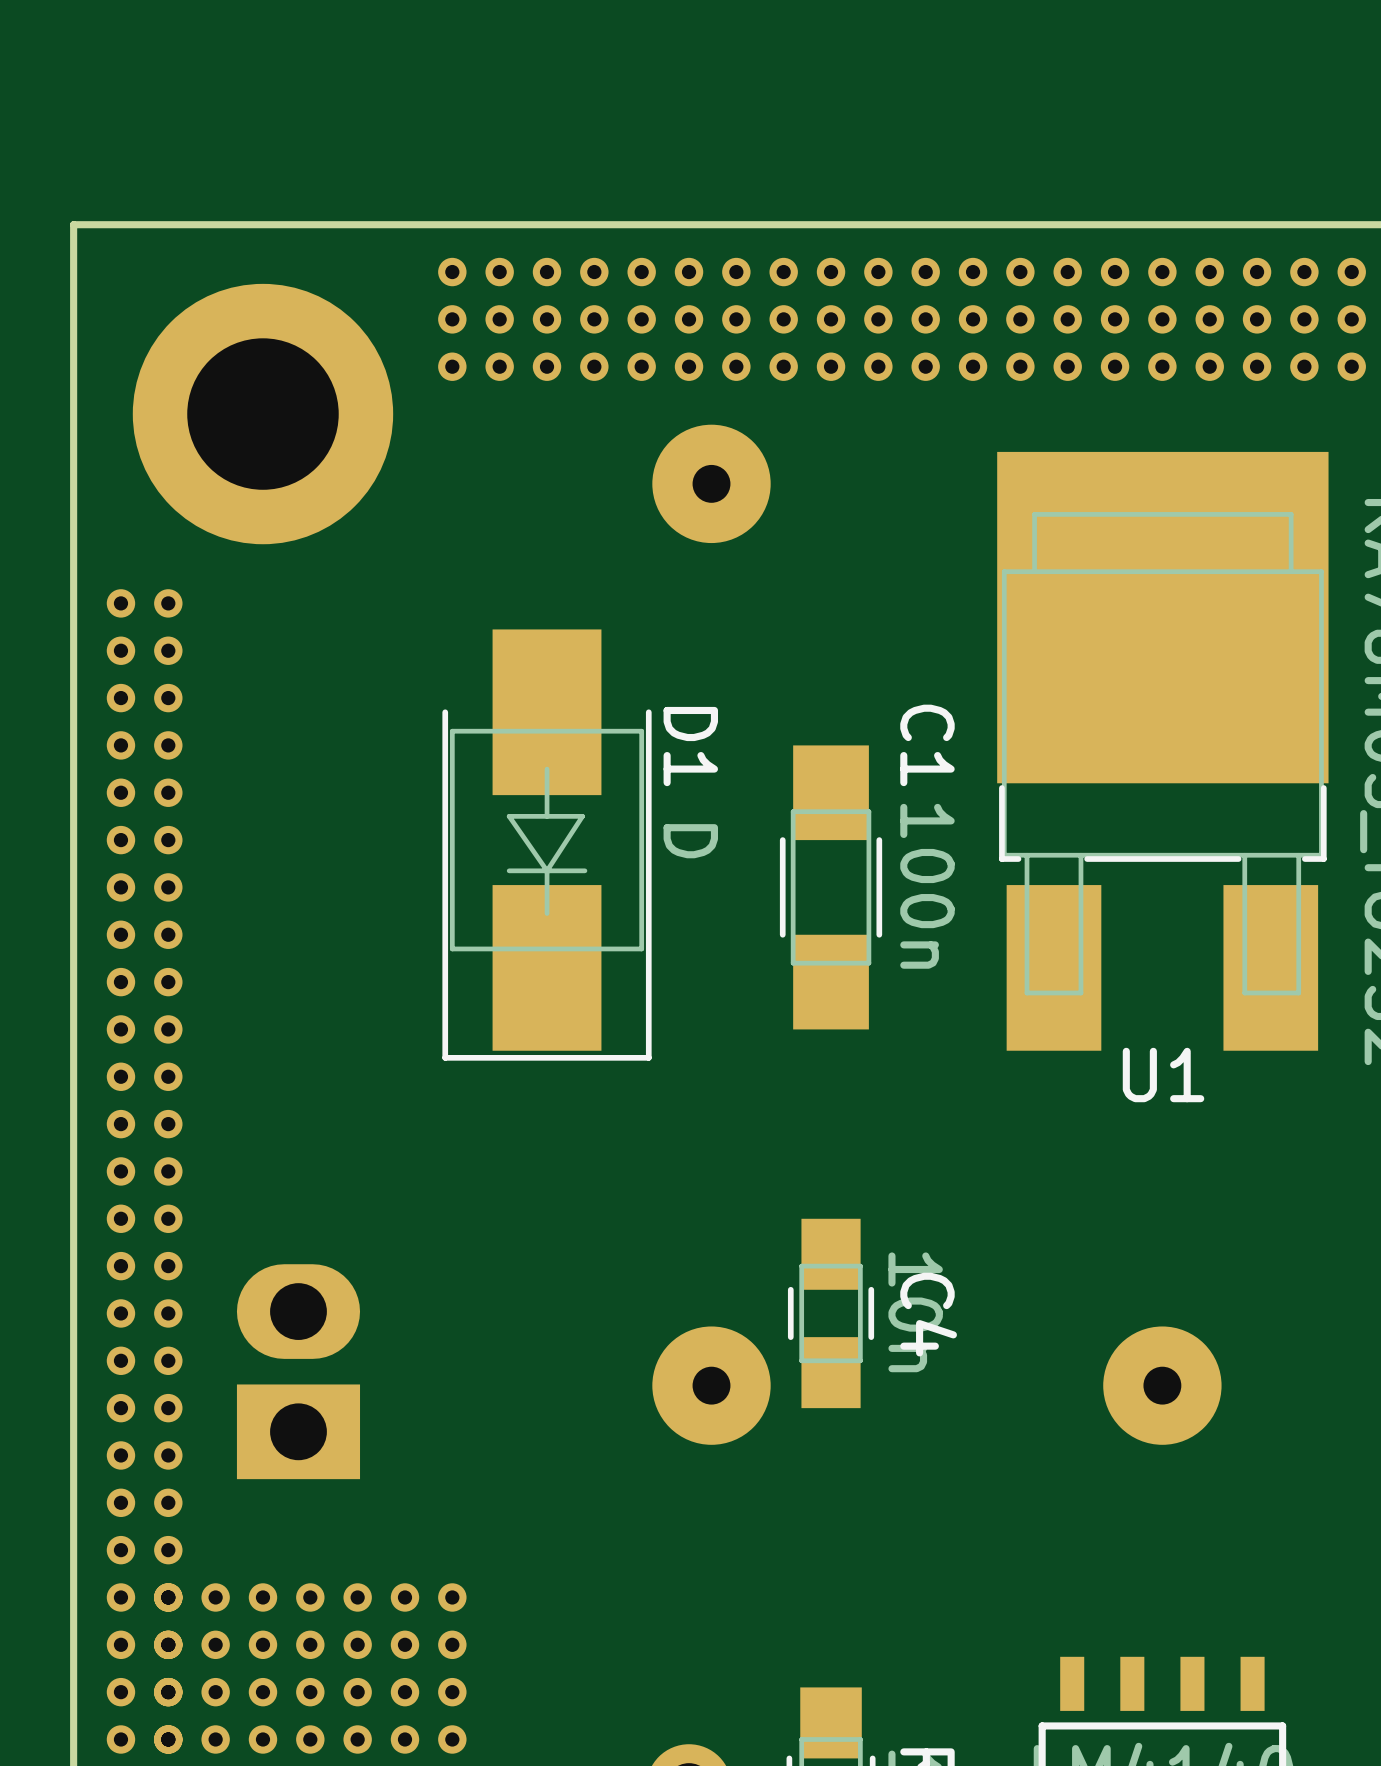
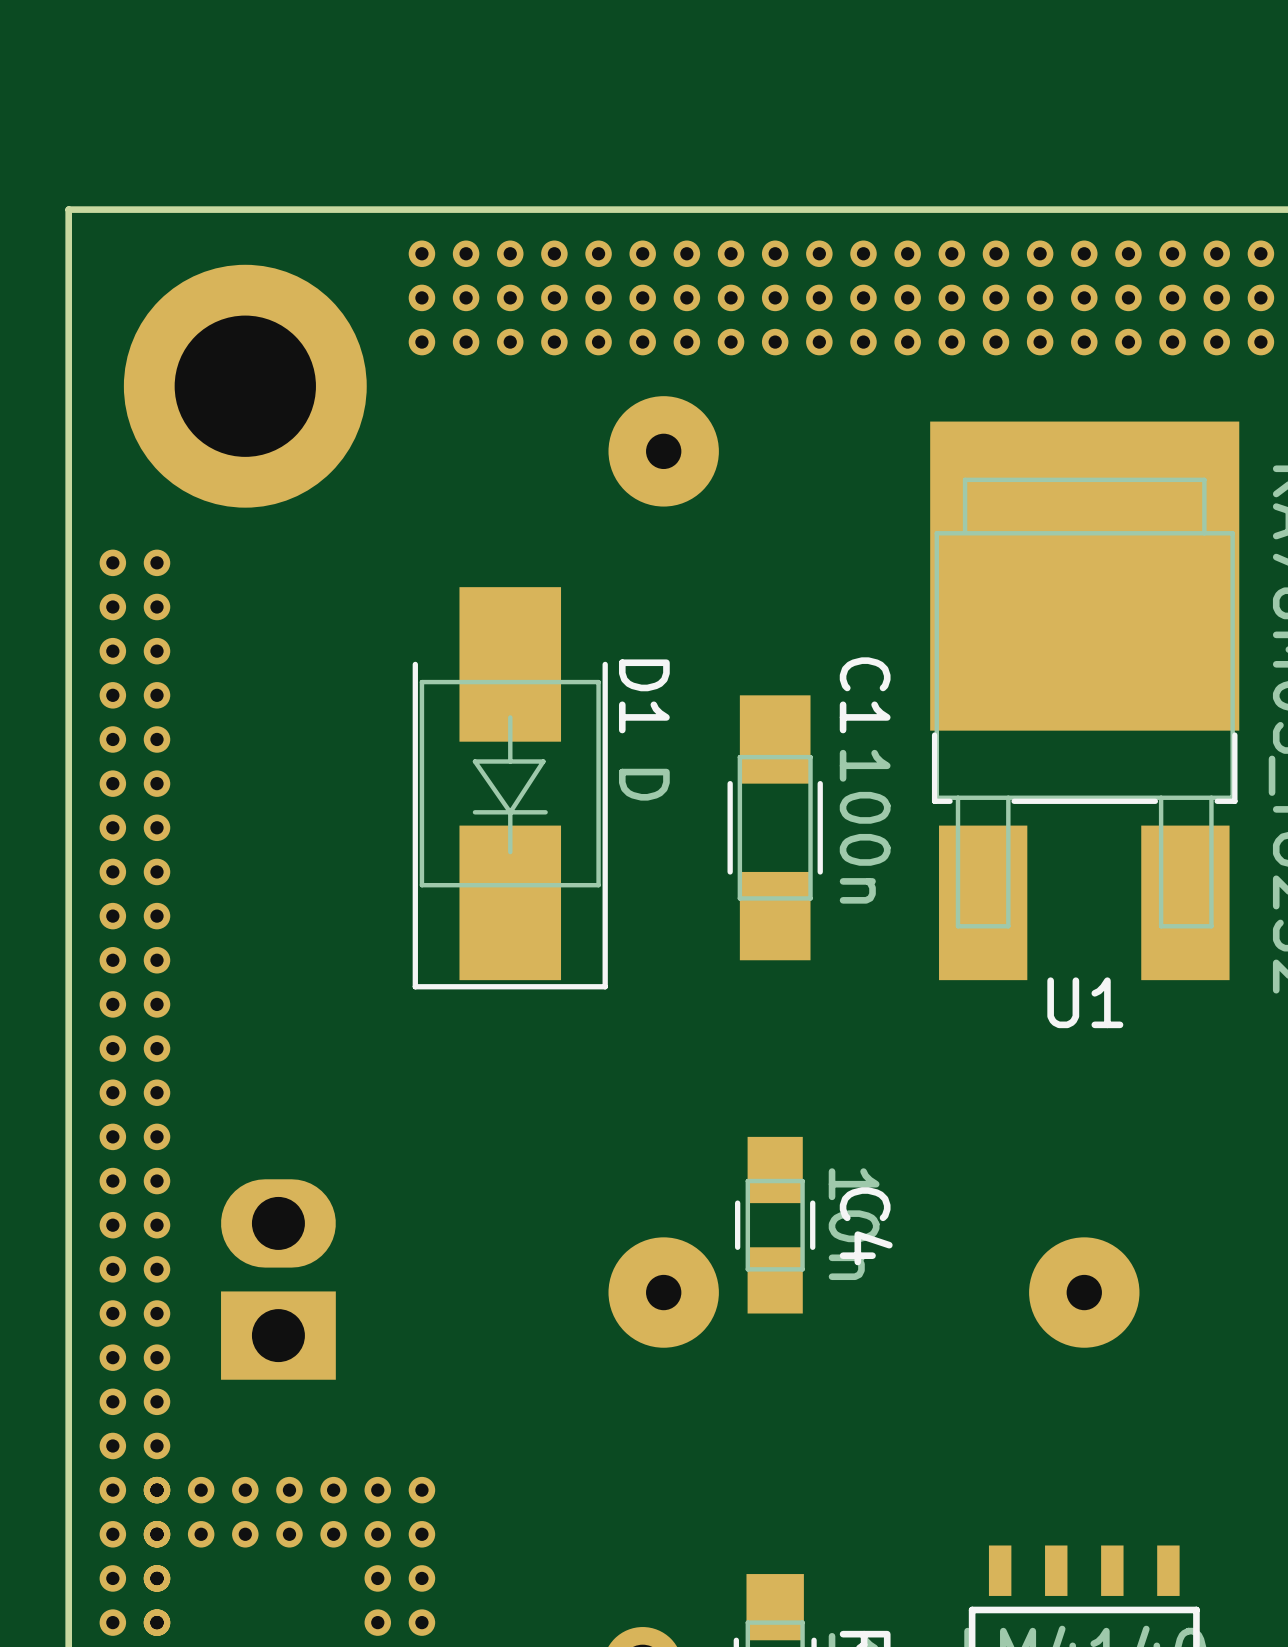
part: (215, 1692) -> none
part: (262, 1692) -> none
part: (310, 1692) -> none
part: (357, 1692) -> none
part: (215, 1739) -> none
part: (262, 1739) -> none
part: (310, 1739) -> none
part: (357, 1739) -> none

